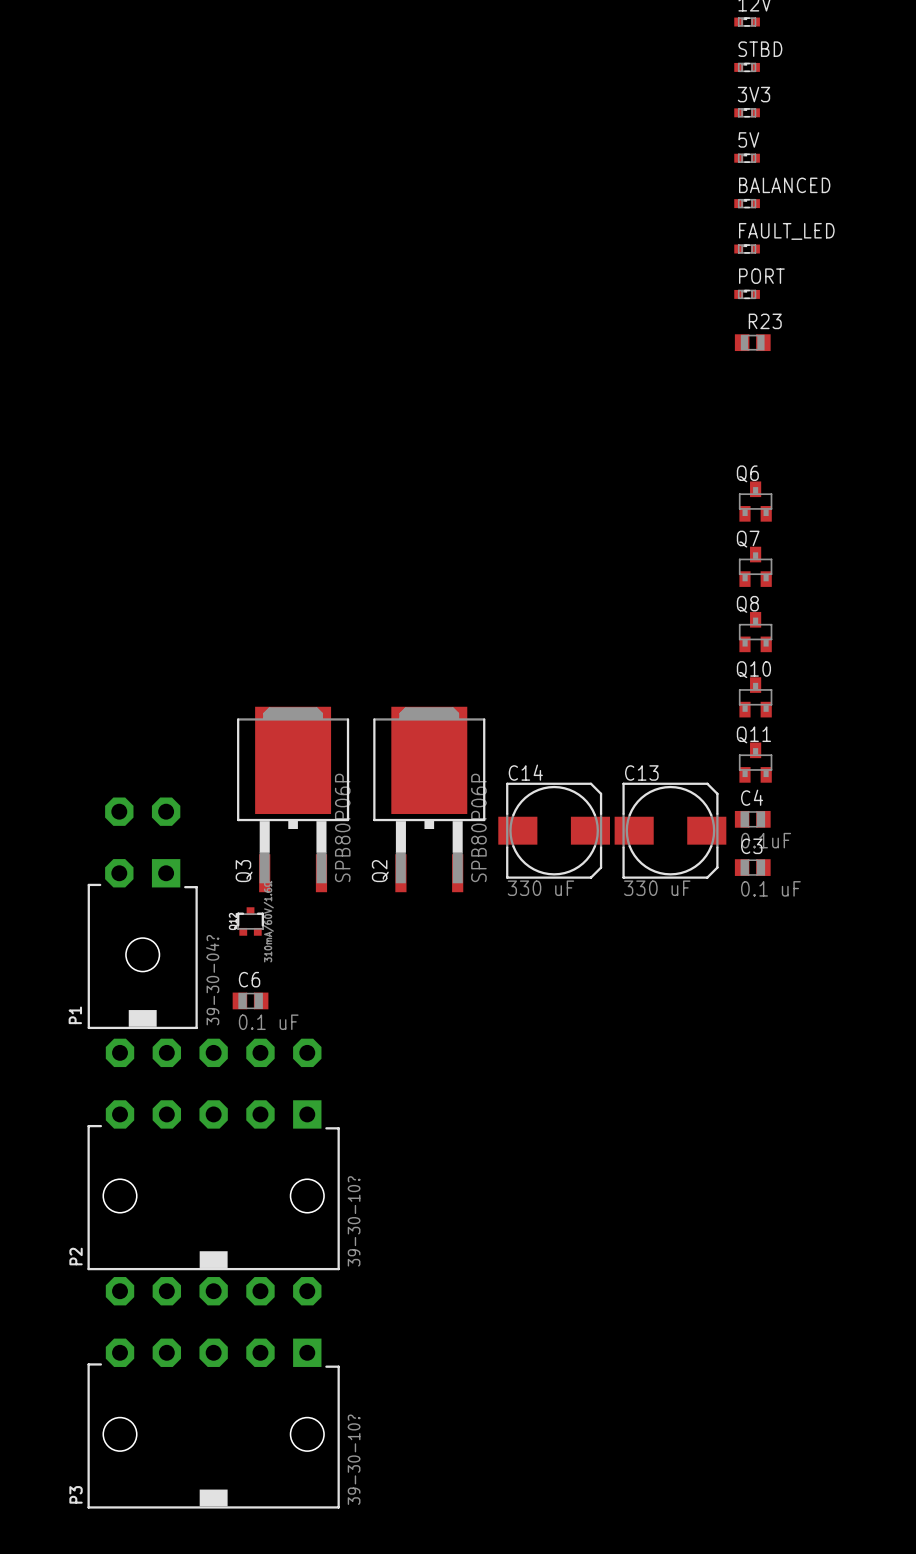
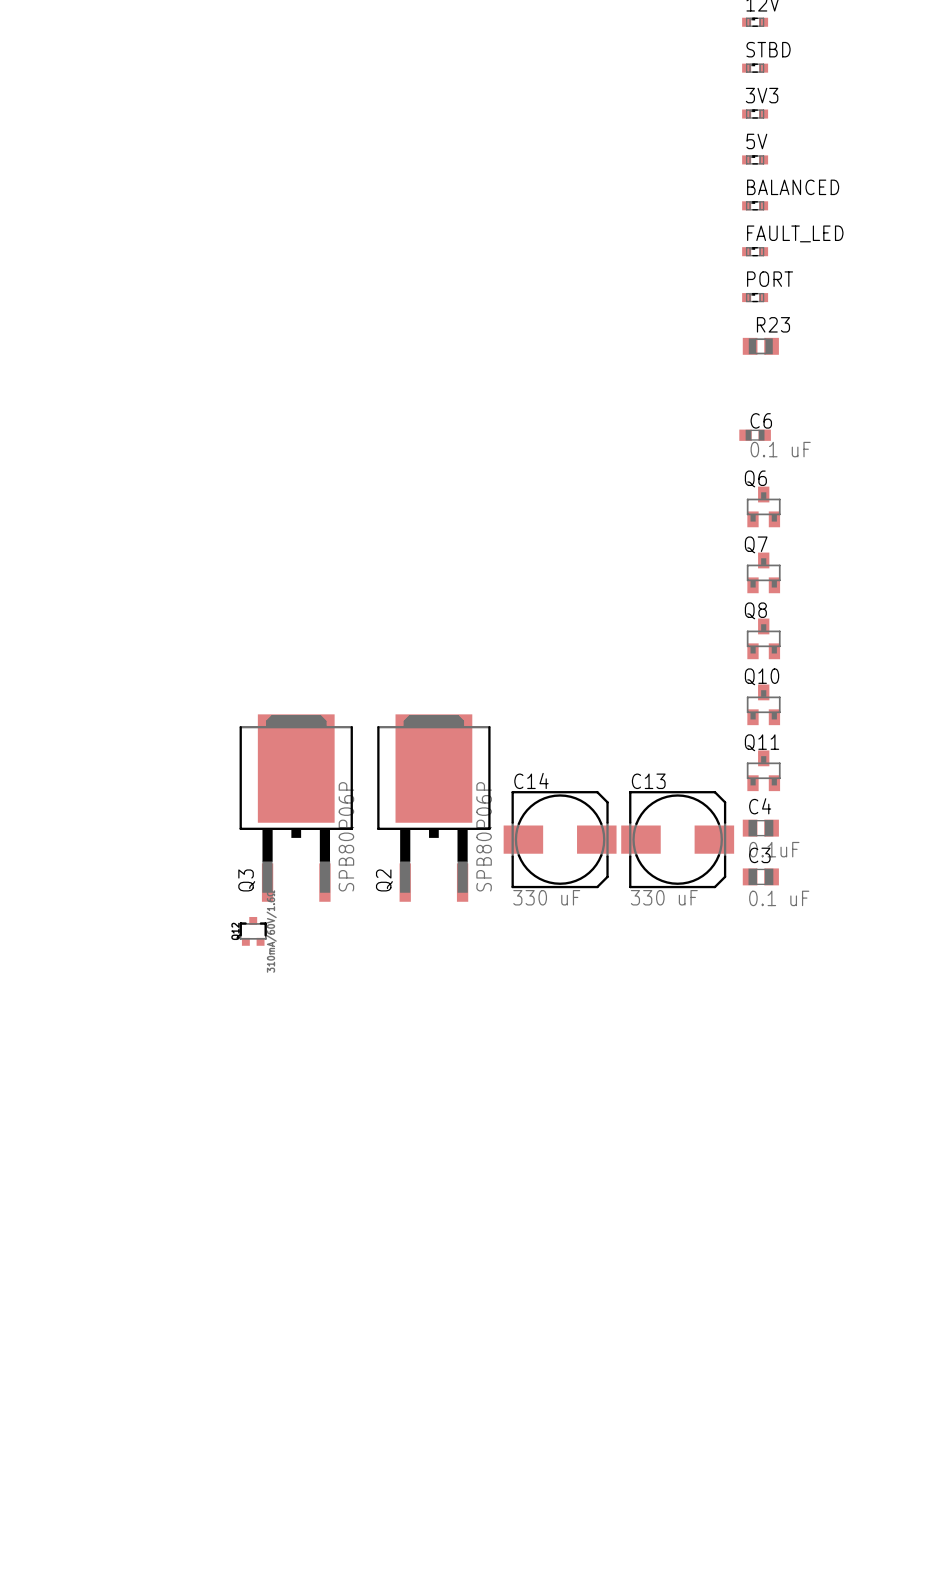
P1: 39-30-04? (142, 913) -> none
C6 footprint: [232, 992, 269, 1010] -> [739, 429, 771, 441]
P2: 39-30-10? (213, 1154) -> none
P3: 39-30-10? (213, 1392) -> none

